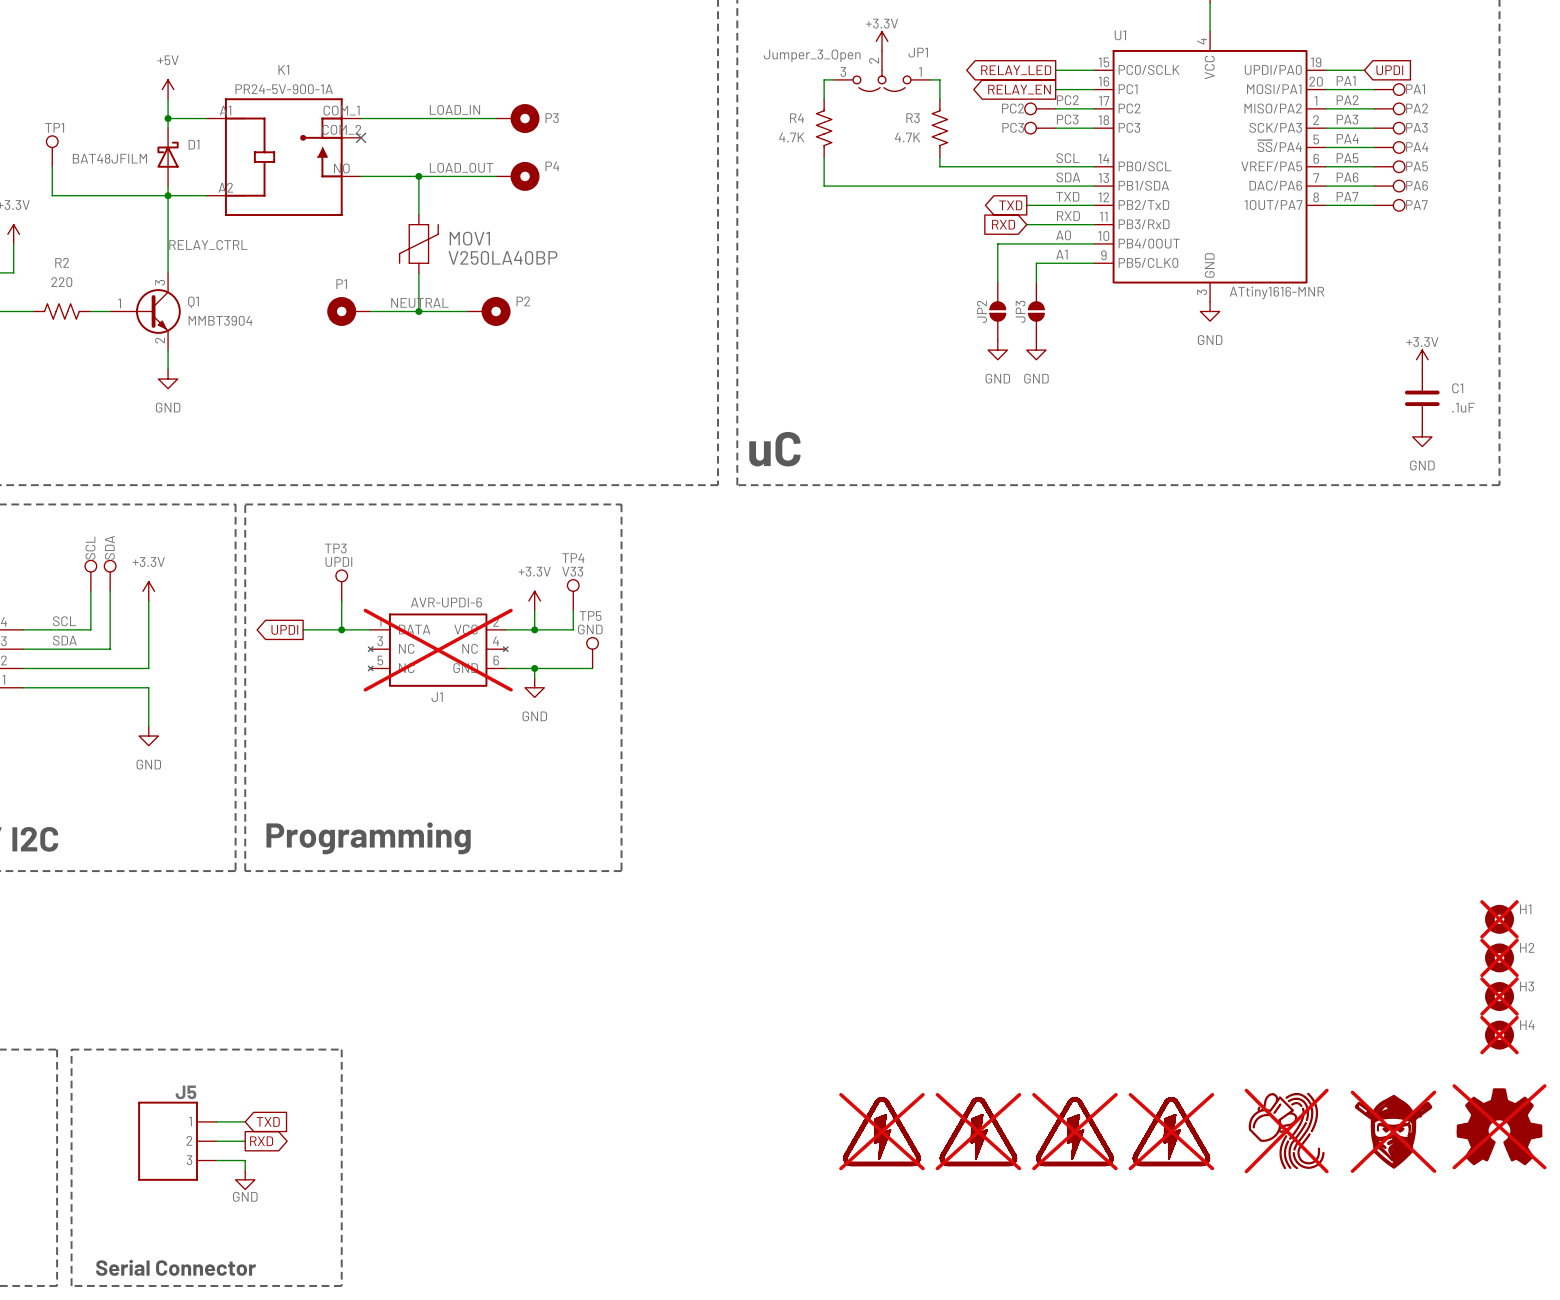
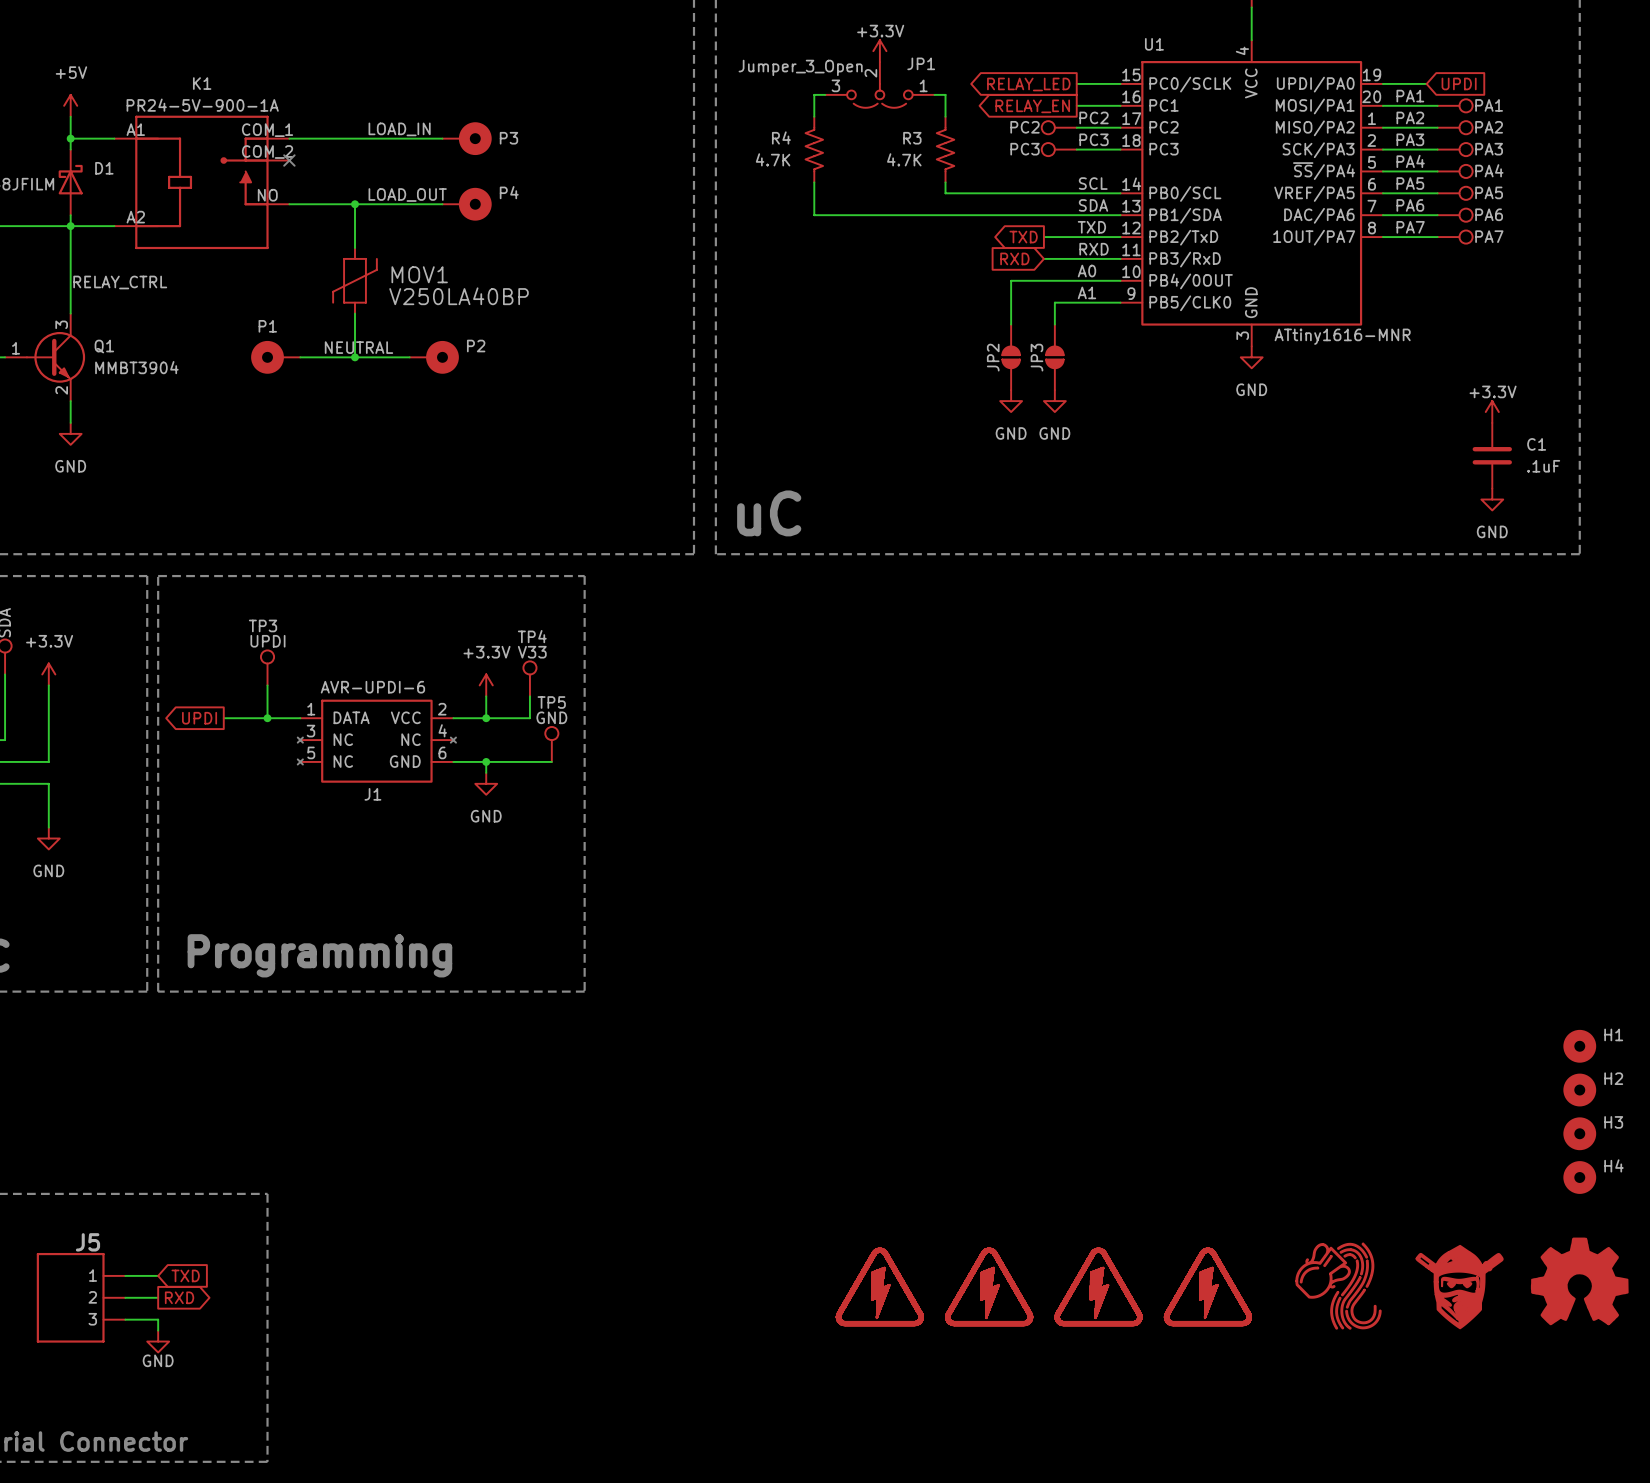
J1 do-not-place cross: (438, 650) -> none
H1 do-not-place cross: (1499, 919) -> none
H2 do-not-place cross: (1499, 957) -> none
H3 do-not-place cross: (1499, 996) -> none
H4 do-not-place cross: (1499, 1035) -> none
part do-not-place cross: (1499, 1126) -> none
part do-not-place cross: (1286, 1130) -> none
part do-not-place cross: (881, 1131) -> none
part do-not-place cross: (978, 1131) -> none
part do-not-place cross: (1074, 1131) -> none
part do-not-place cross: (1171, 1131) -> none
part do-not-place cross: (1393, 1131) -> none

